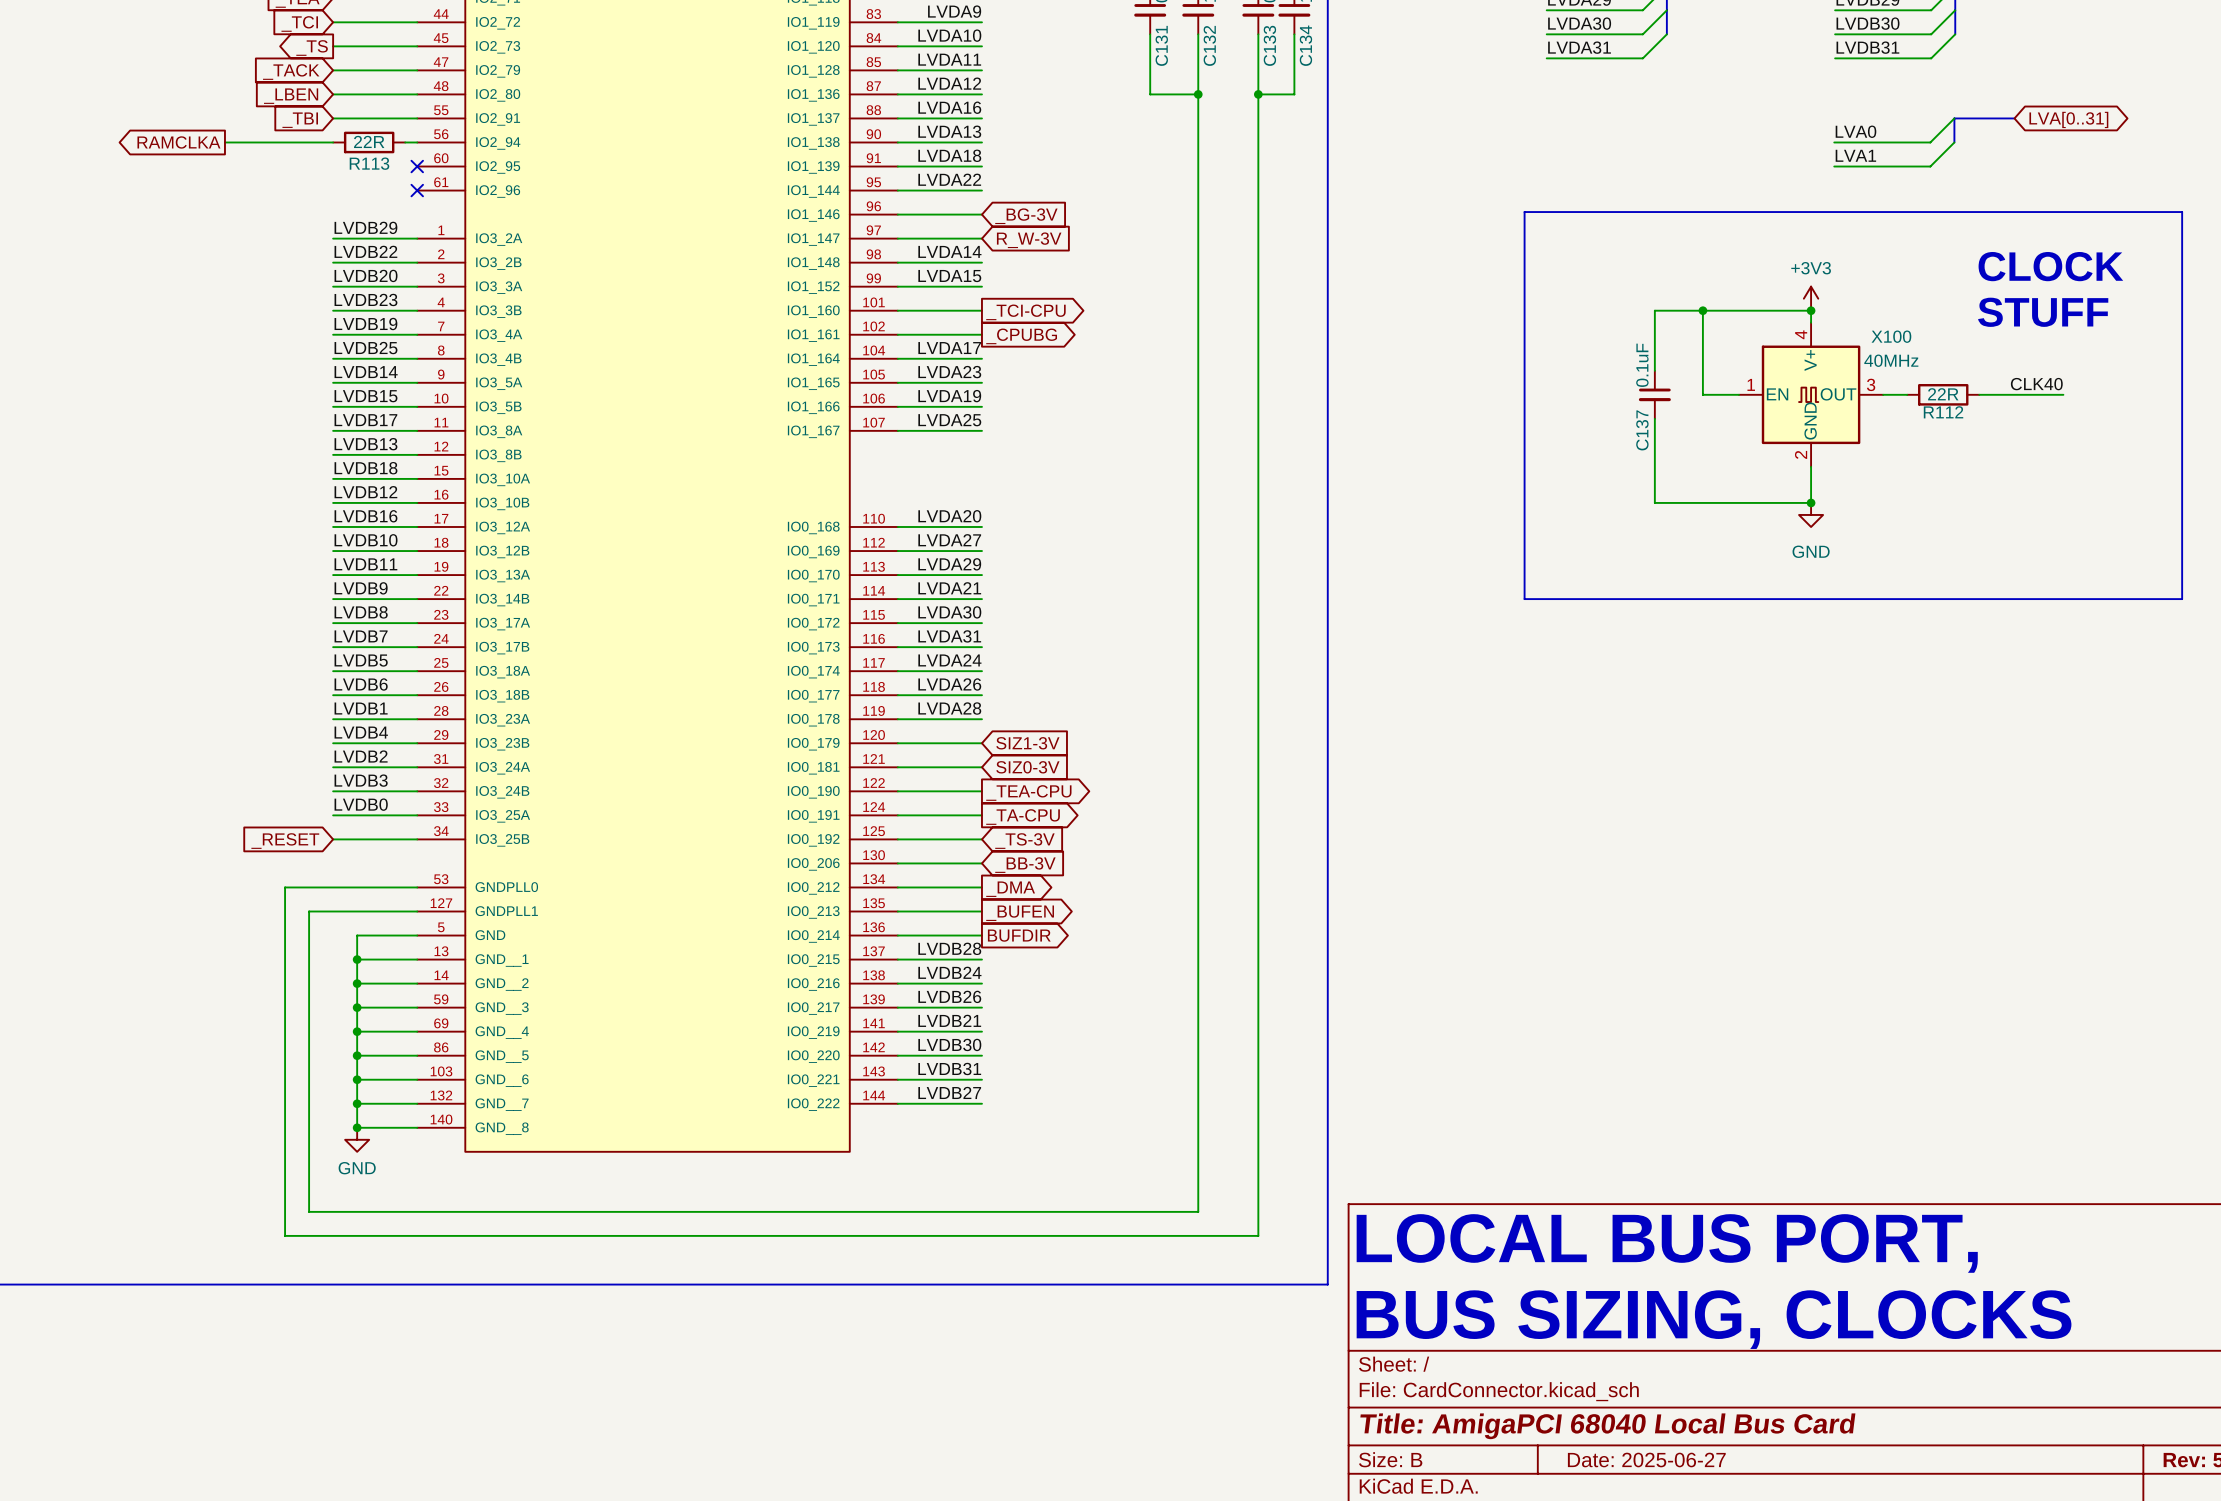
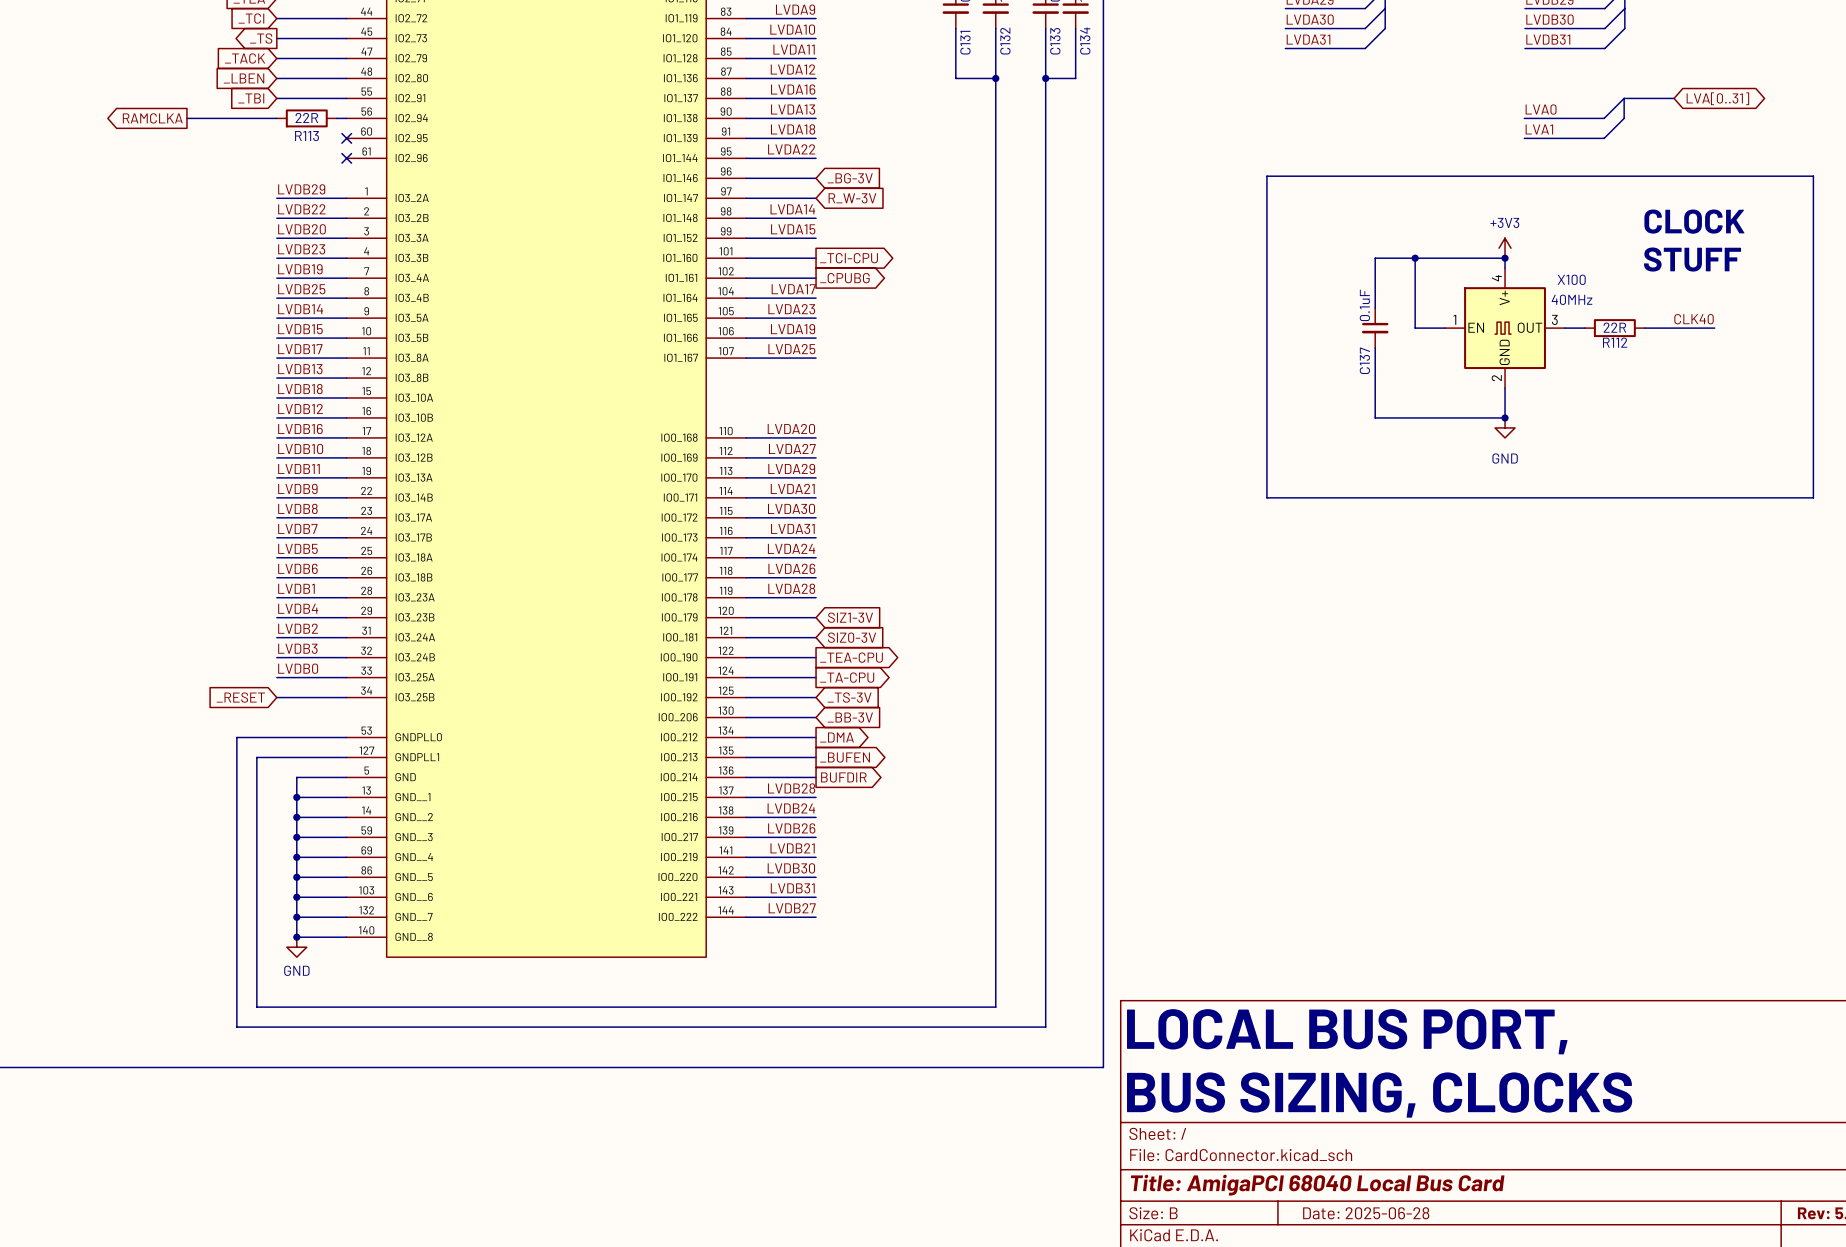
title block: Date: 2025-06-27 (1646, 1460) -> Date: 2025-06-28 (1366, 1213)

